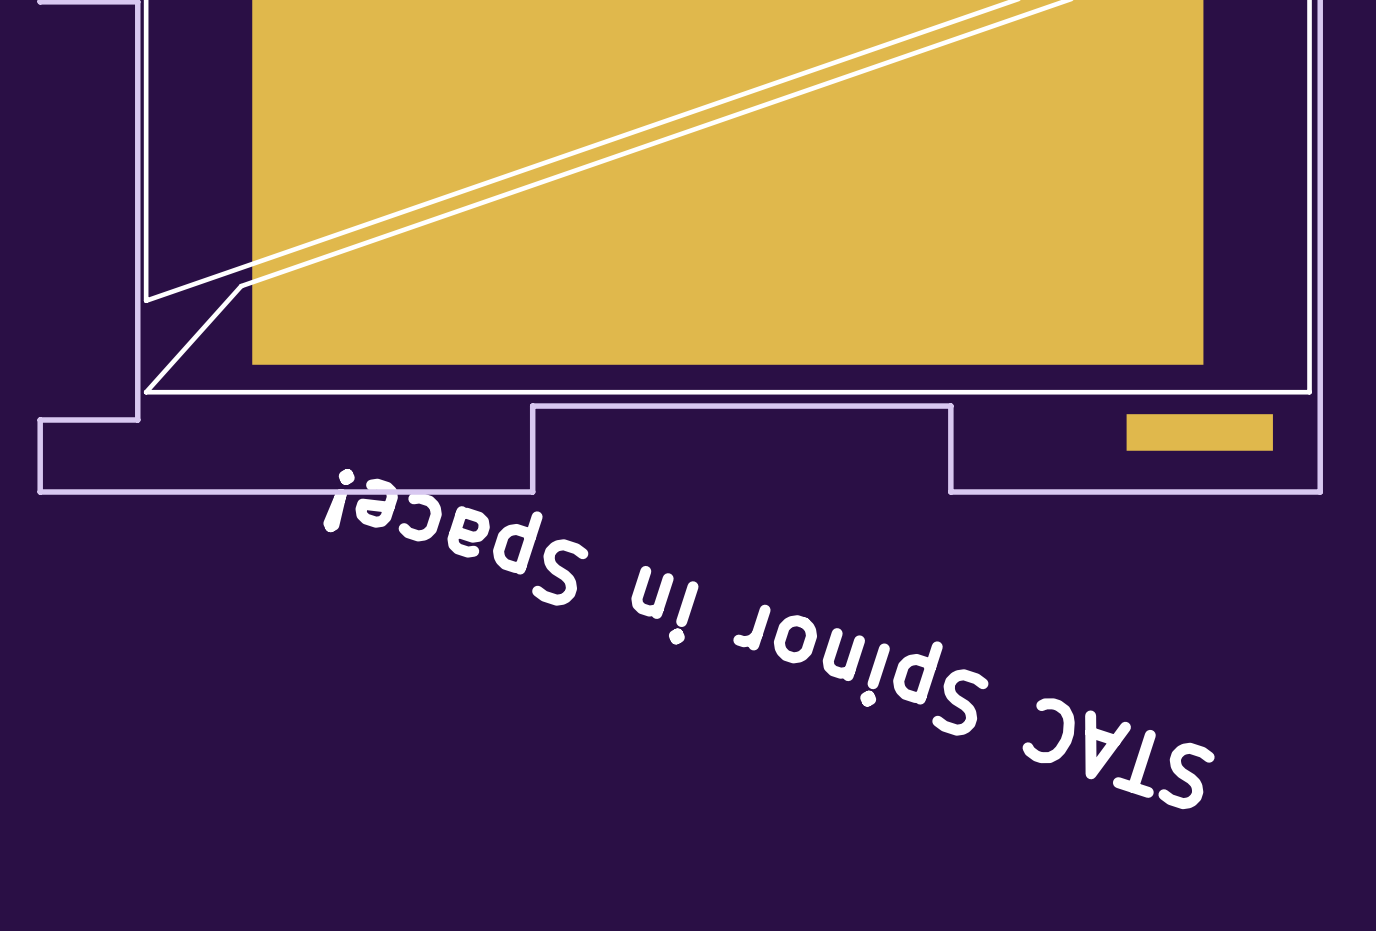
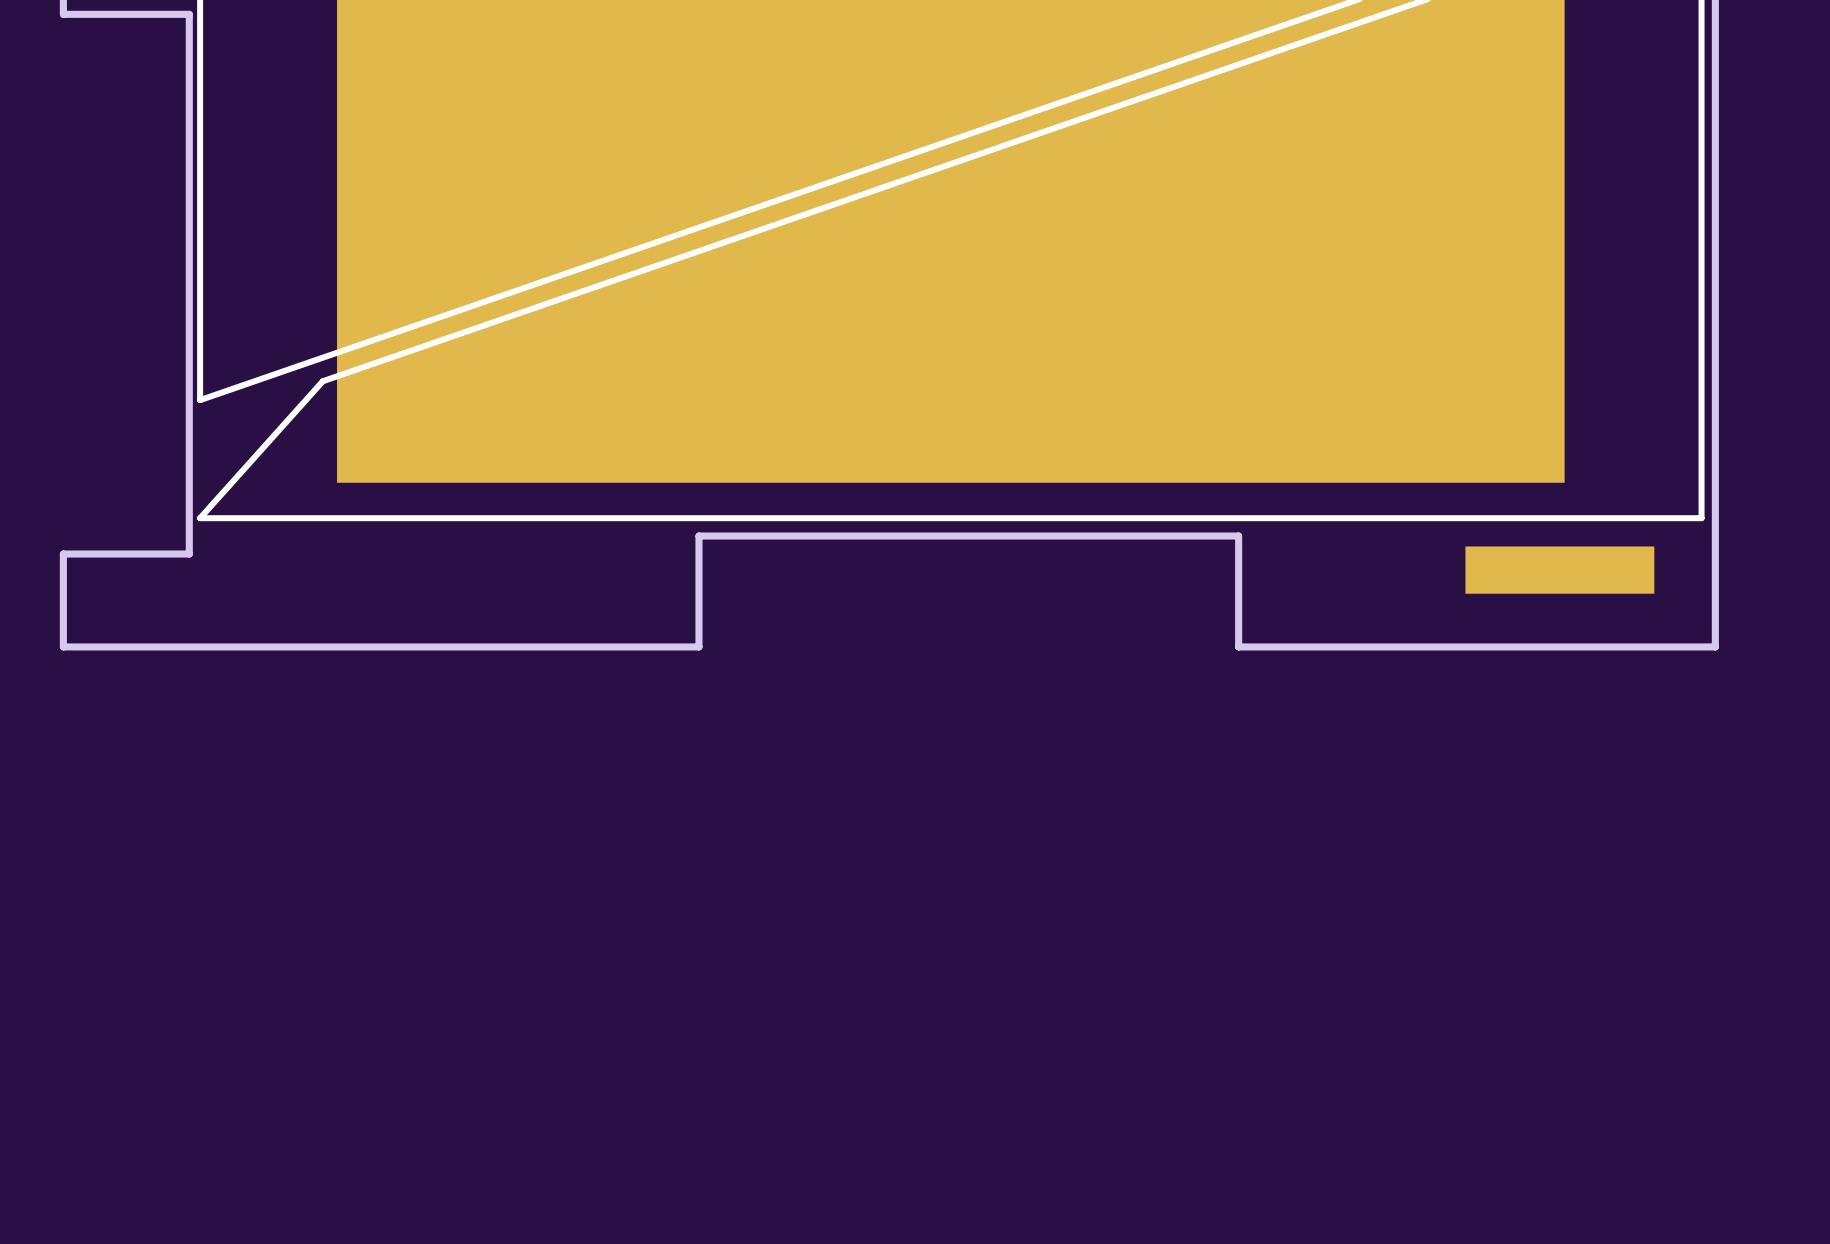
text: STAC Spinor in Space! (769, 639) -> none

